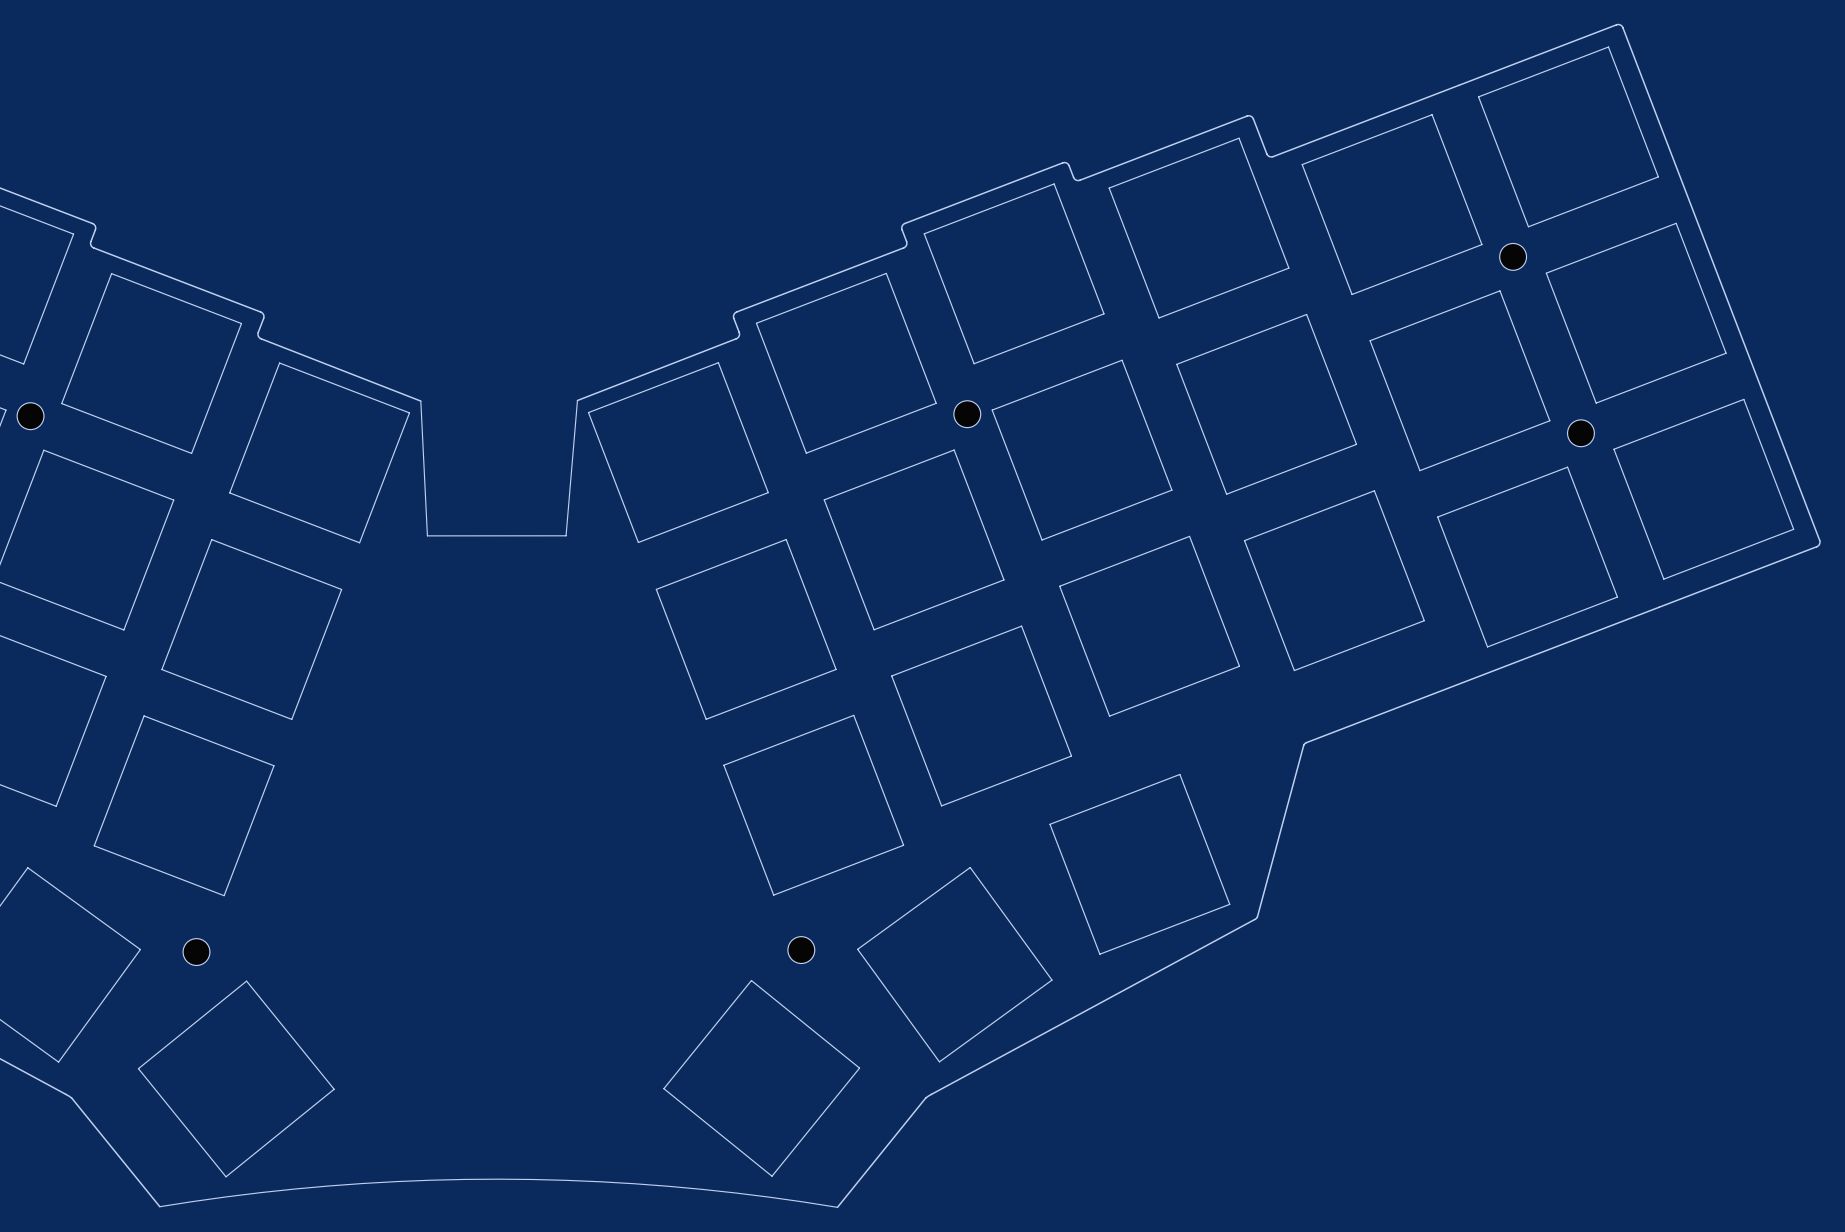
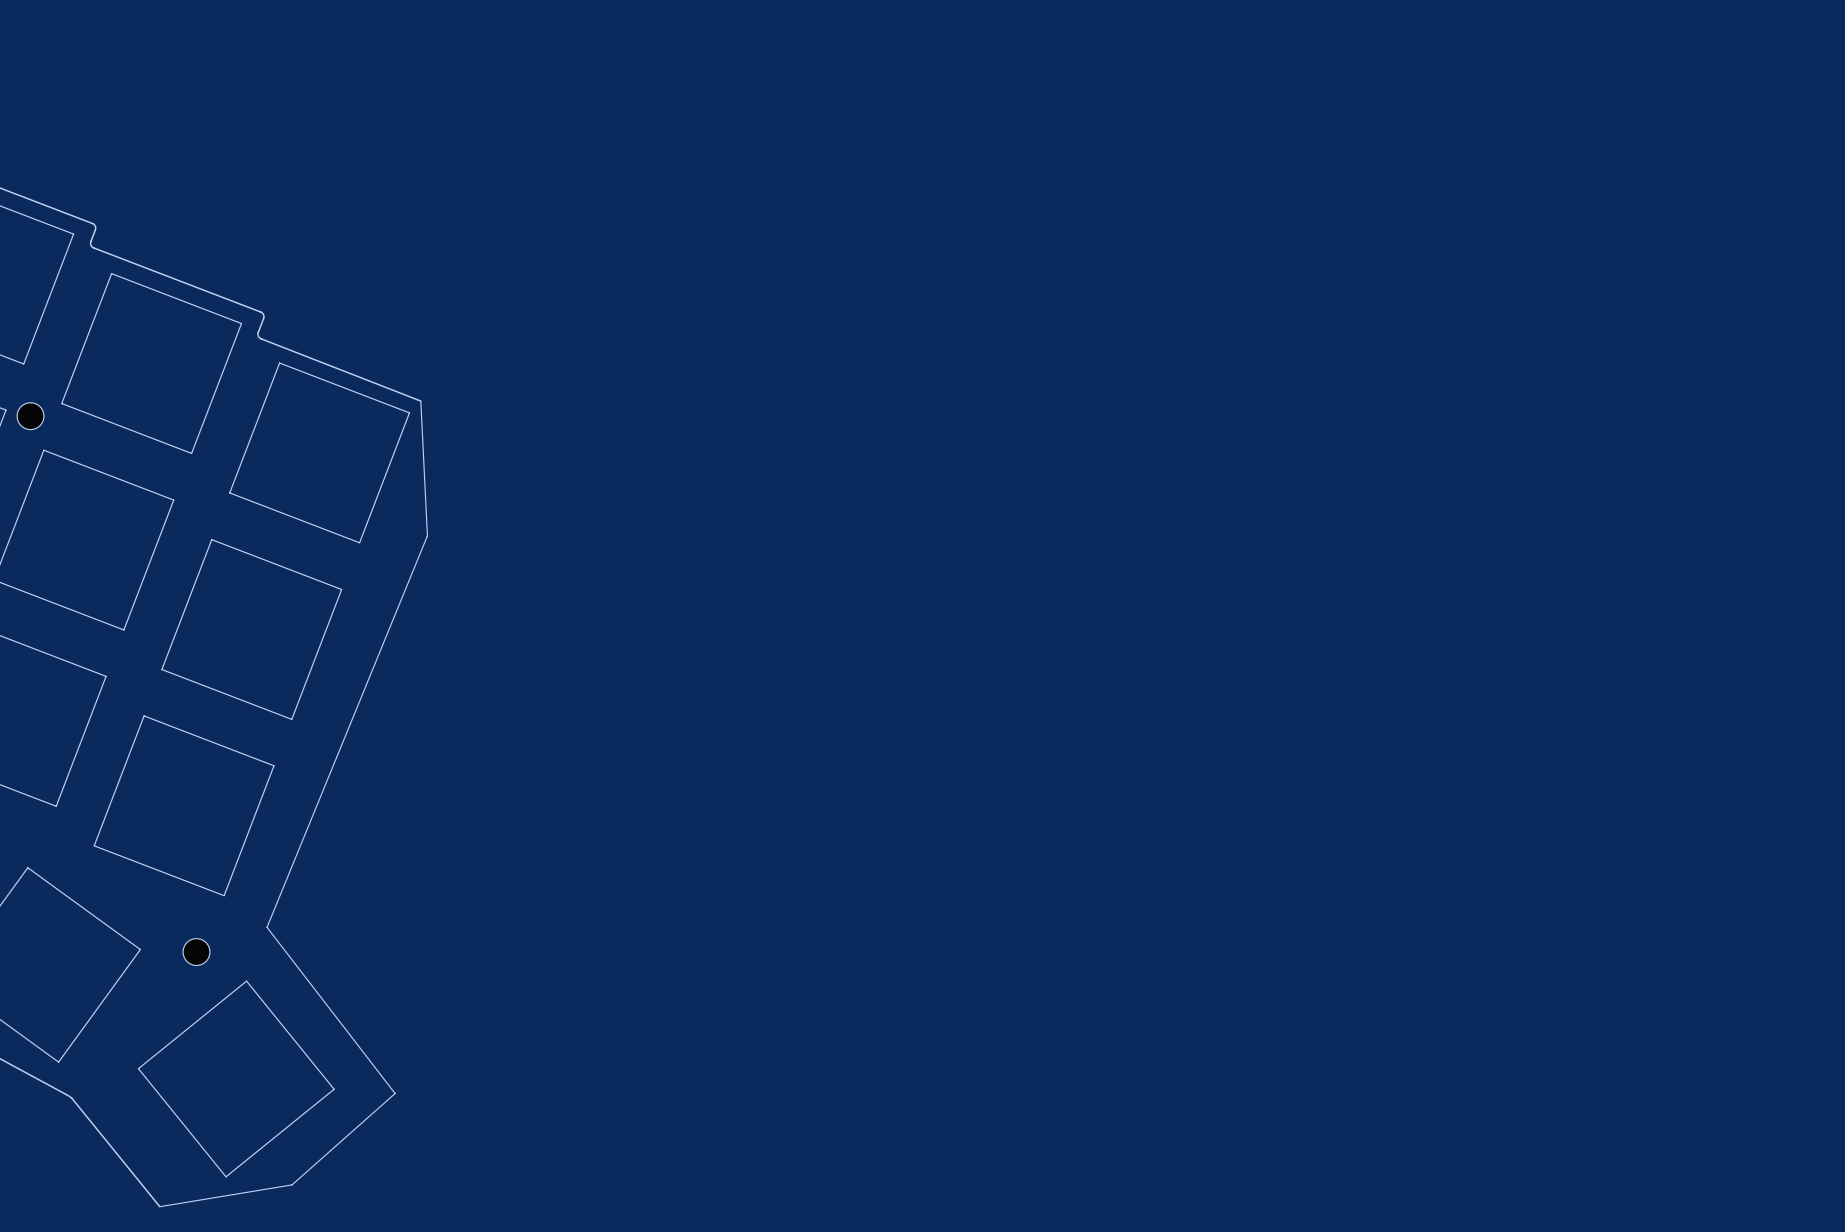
drawing: [1301, 46, 1795, 648] -> none
drawing: [587, 137, 1425, 1177] -> none
part: (1513, 256) -> none
part: (967, 414) -> none
part: (1580, 433) -> none
board edge: (427, 535) (566, 535) (577, 400) (736, 338) (739, 333) (733, 317) (735, 312) (904, 247) (906, 242) (901, 227) (904, 223) (1063, 162) (1068, 164) (1074, 179) (1079, 180) (1247, 115) (1253, 118) (1267, 154) (1272, 156) (1618, 24) (1622, 27) (1819, 541) (1816, 546) (1305, 743) (1256, 918) (928, 1096) (837, 1207) (736, 1193) (668, 1186) (600, 1181) (498, 1179) (430, 1180) (328, 1185) (227, 1196) (159, 1206) -> (427, 535) (267, 927) (395, 1093) (291, 1184) (159, 1206)
part: (801, 950) -> none

